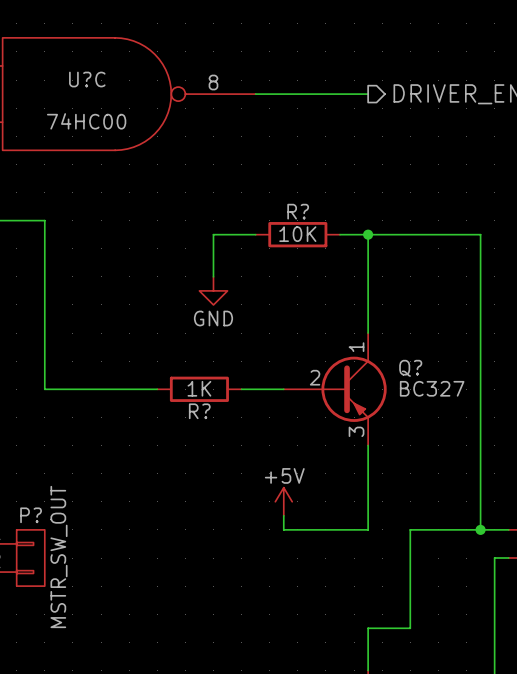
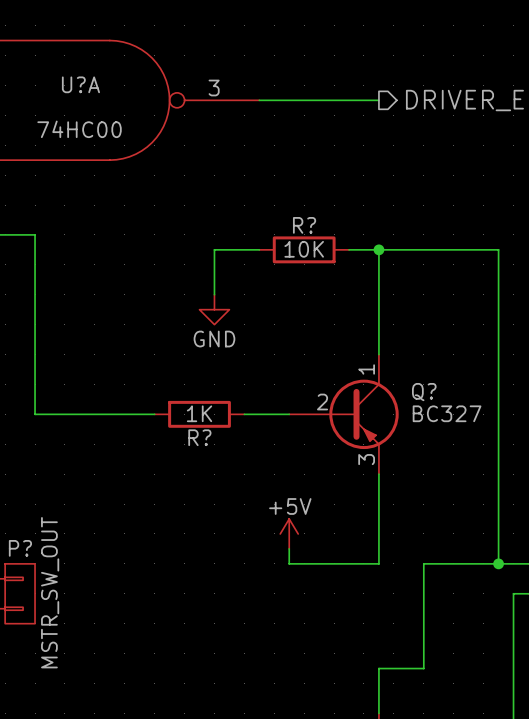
U?C name: U?C (87, 79) -> U?A (80, 84)
U?C pin number: 8 (213, 82) -> 3 (214, 88)

